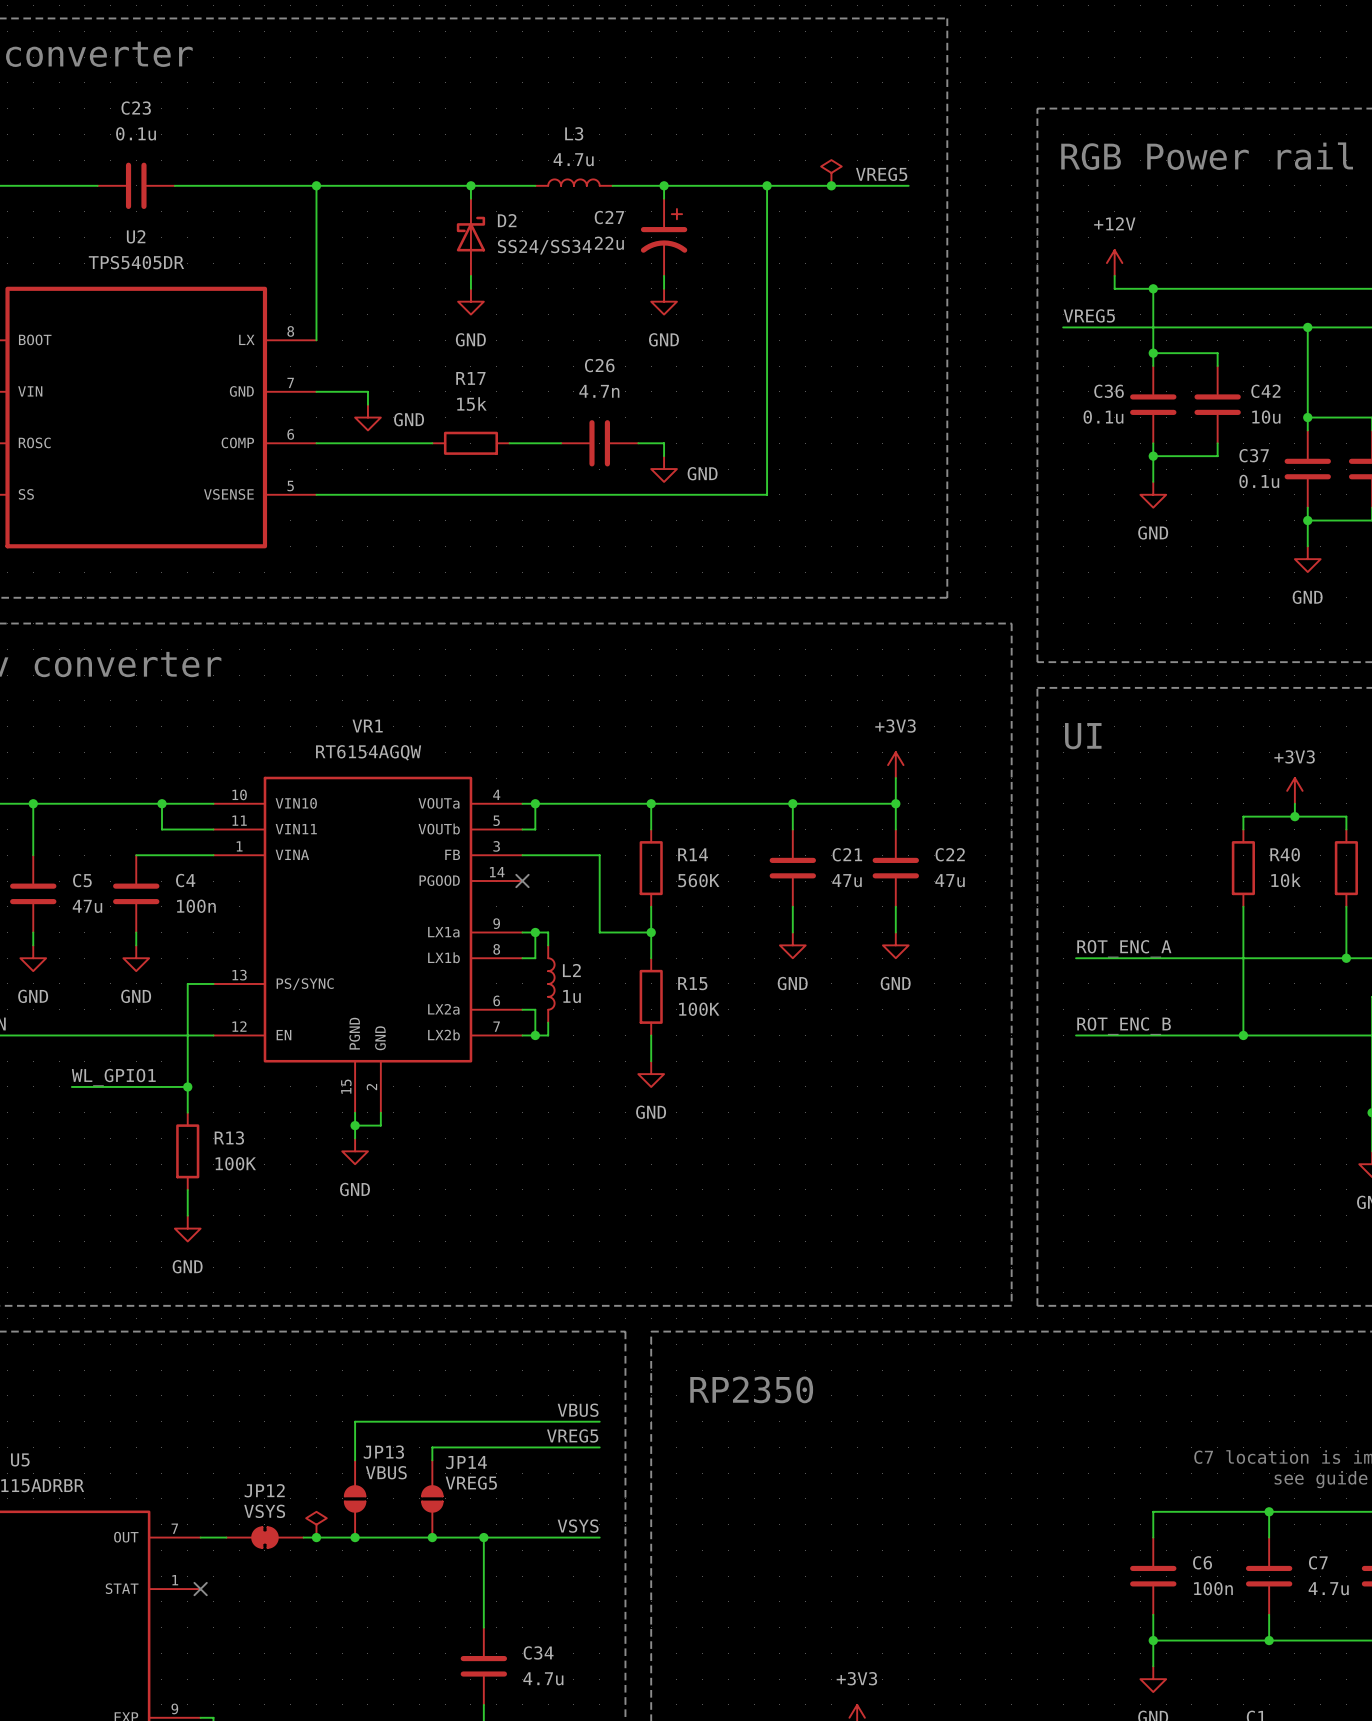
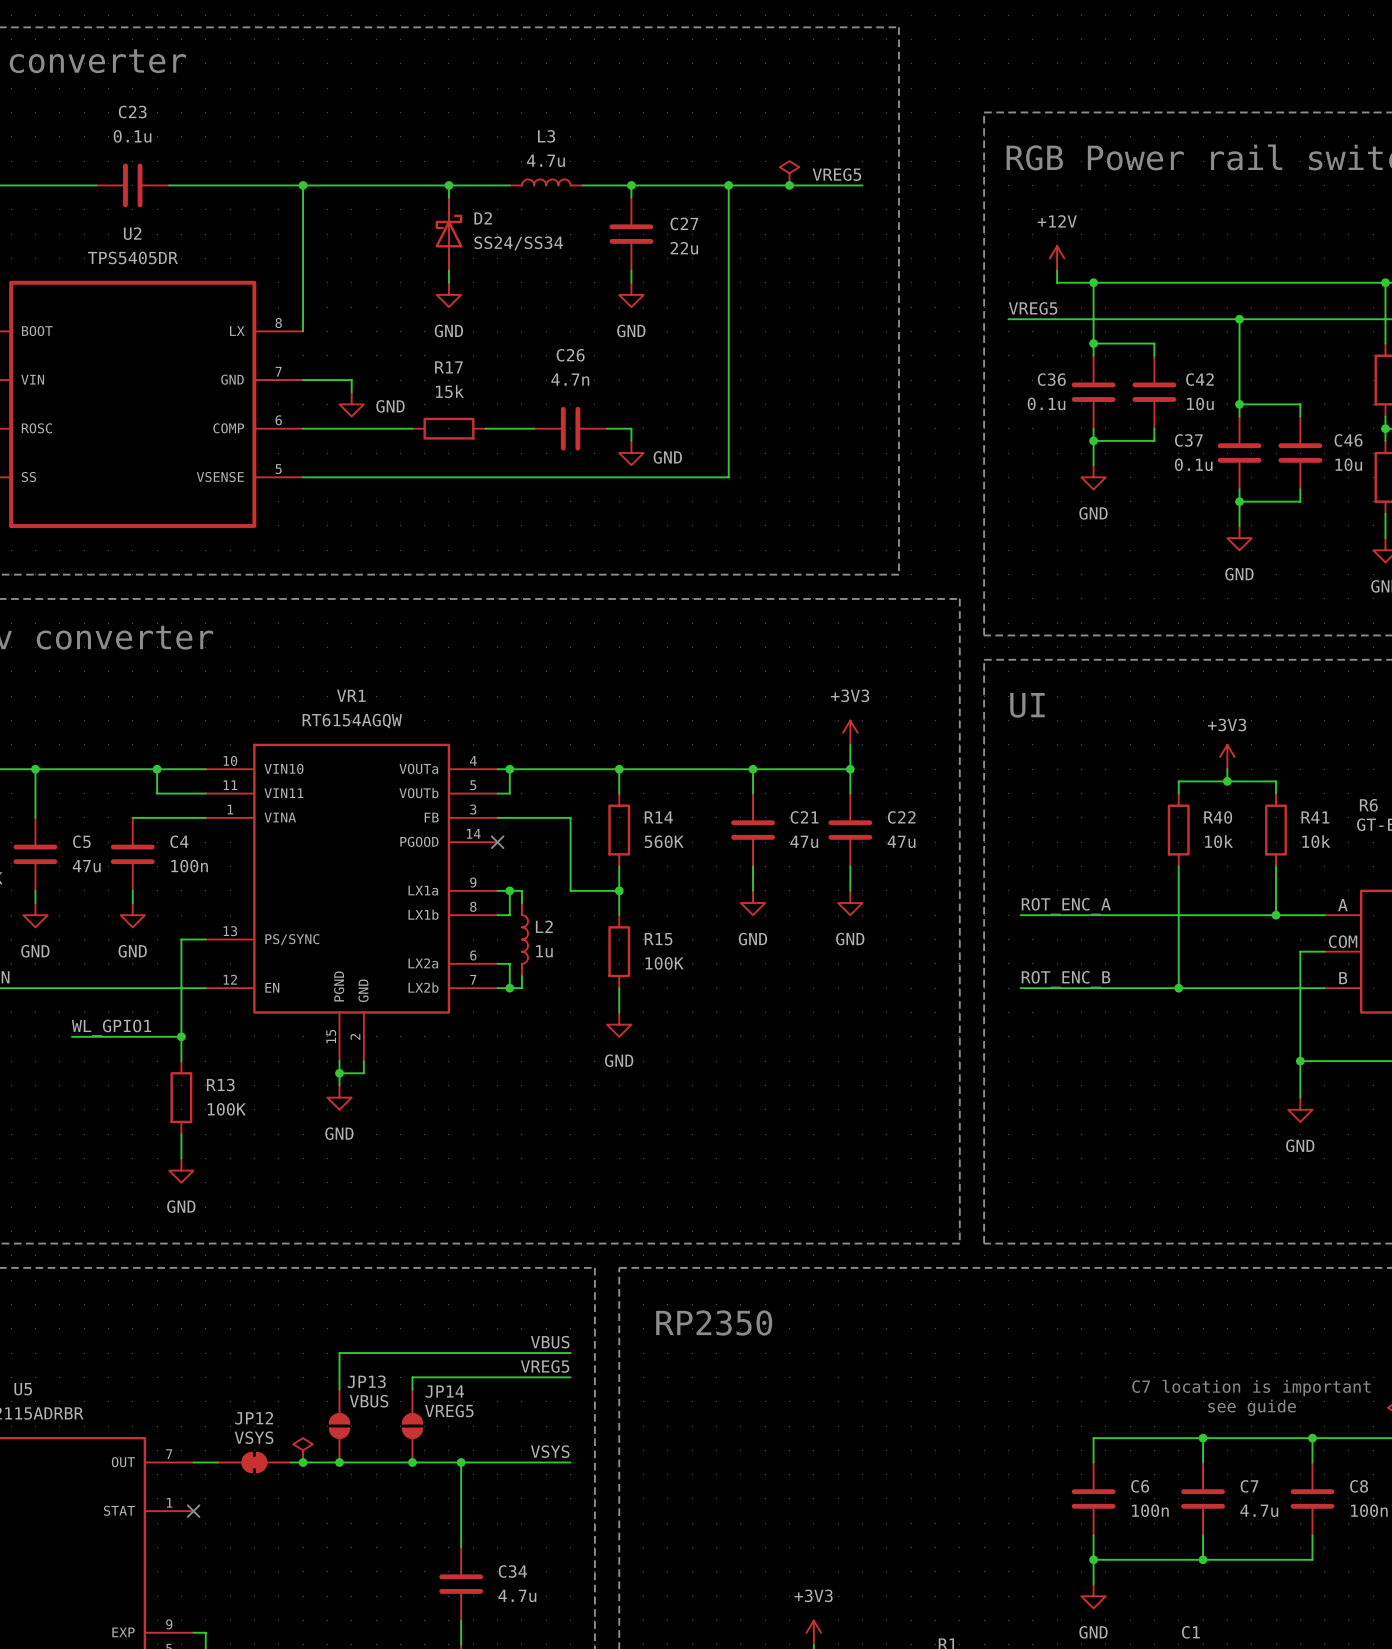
C27 symbol: [640, 198, 688, 276] -> [609, 197, 654, 271]
C27 name position: C27 (609, 217) -> C27 (684, 223)
C27 value position: 22u (609, 243) -> 22u (684, 248)

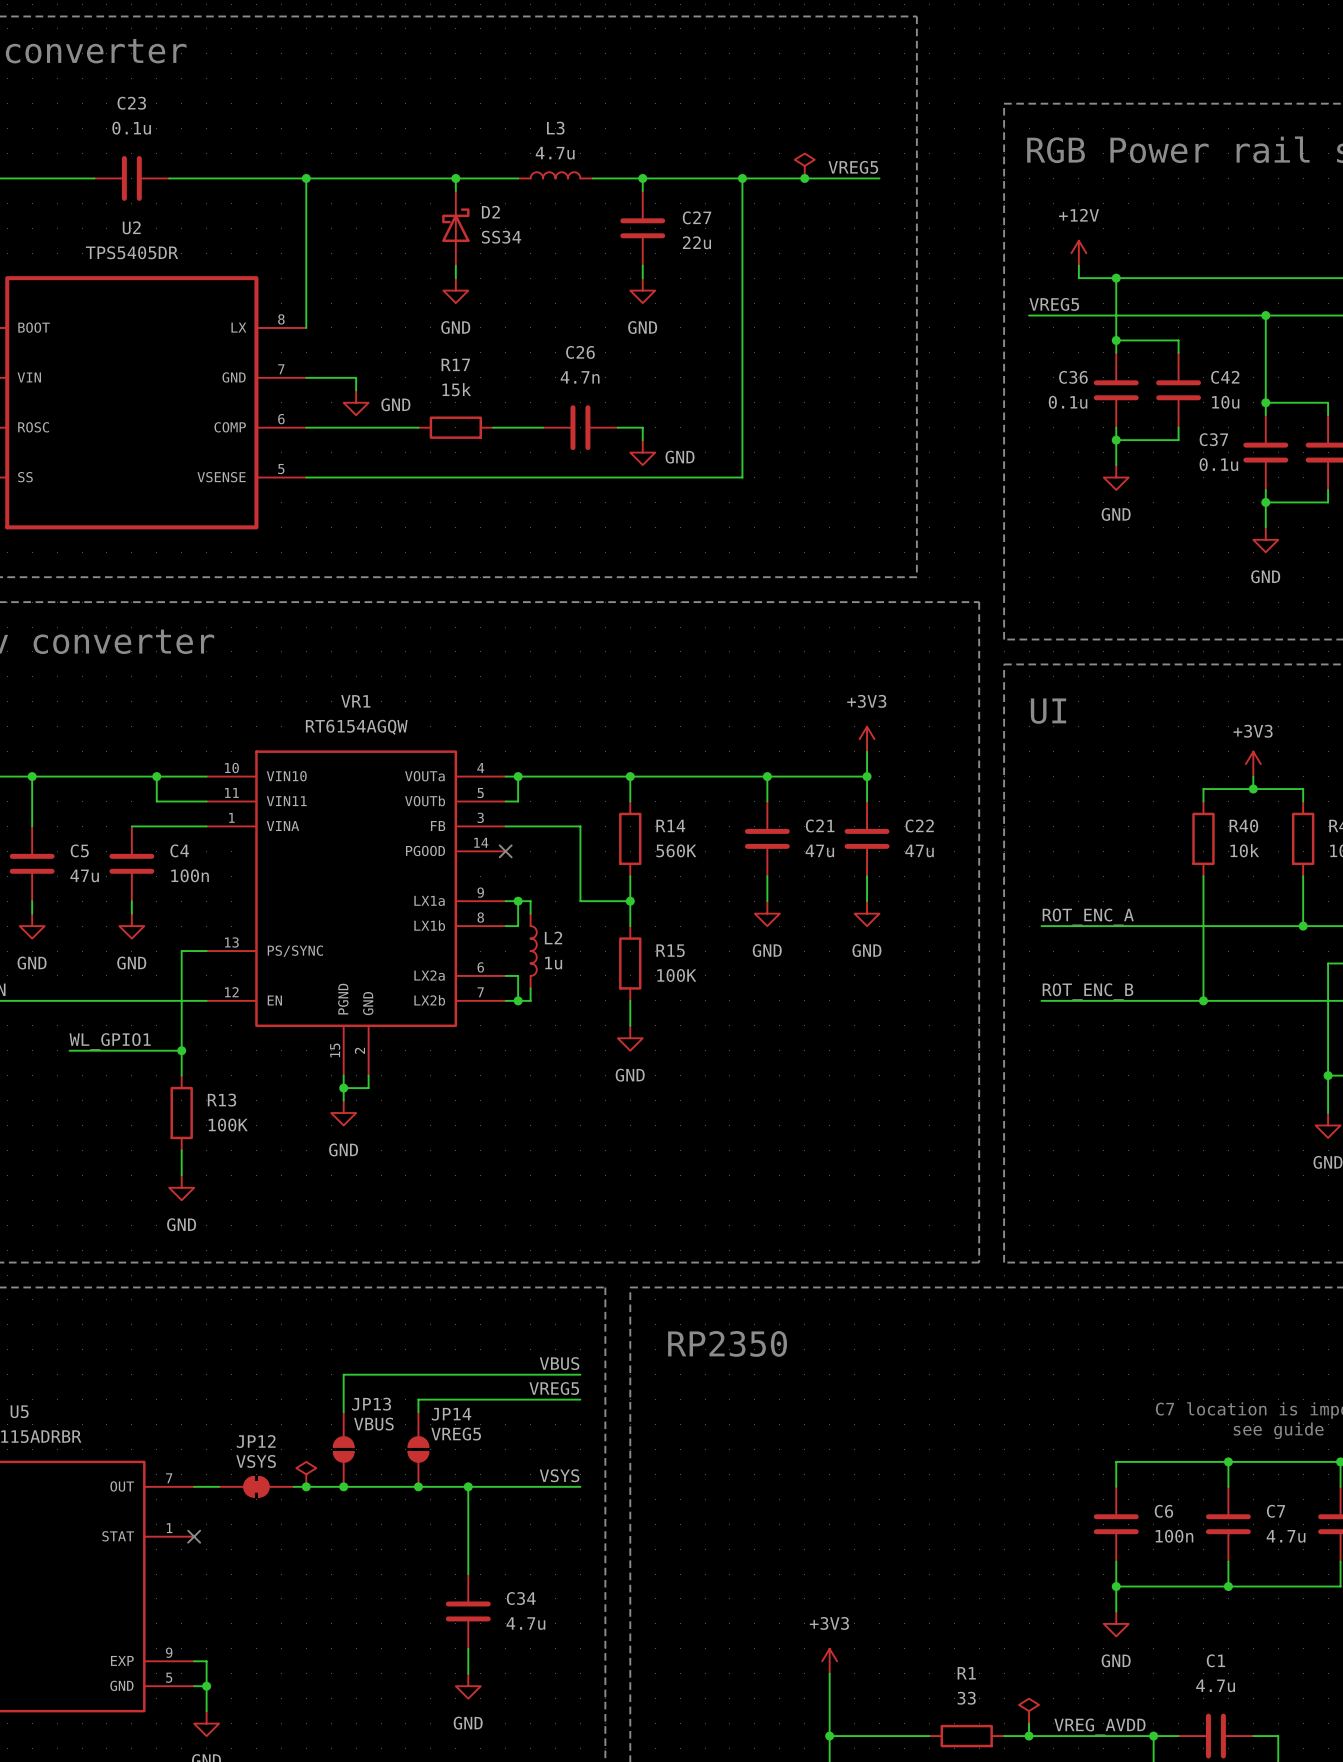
D2 value: SS24/SS34 (518, 243) -> SS34 (501, 237)

